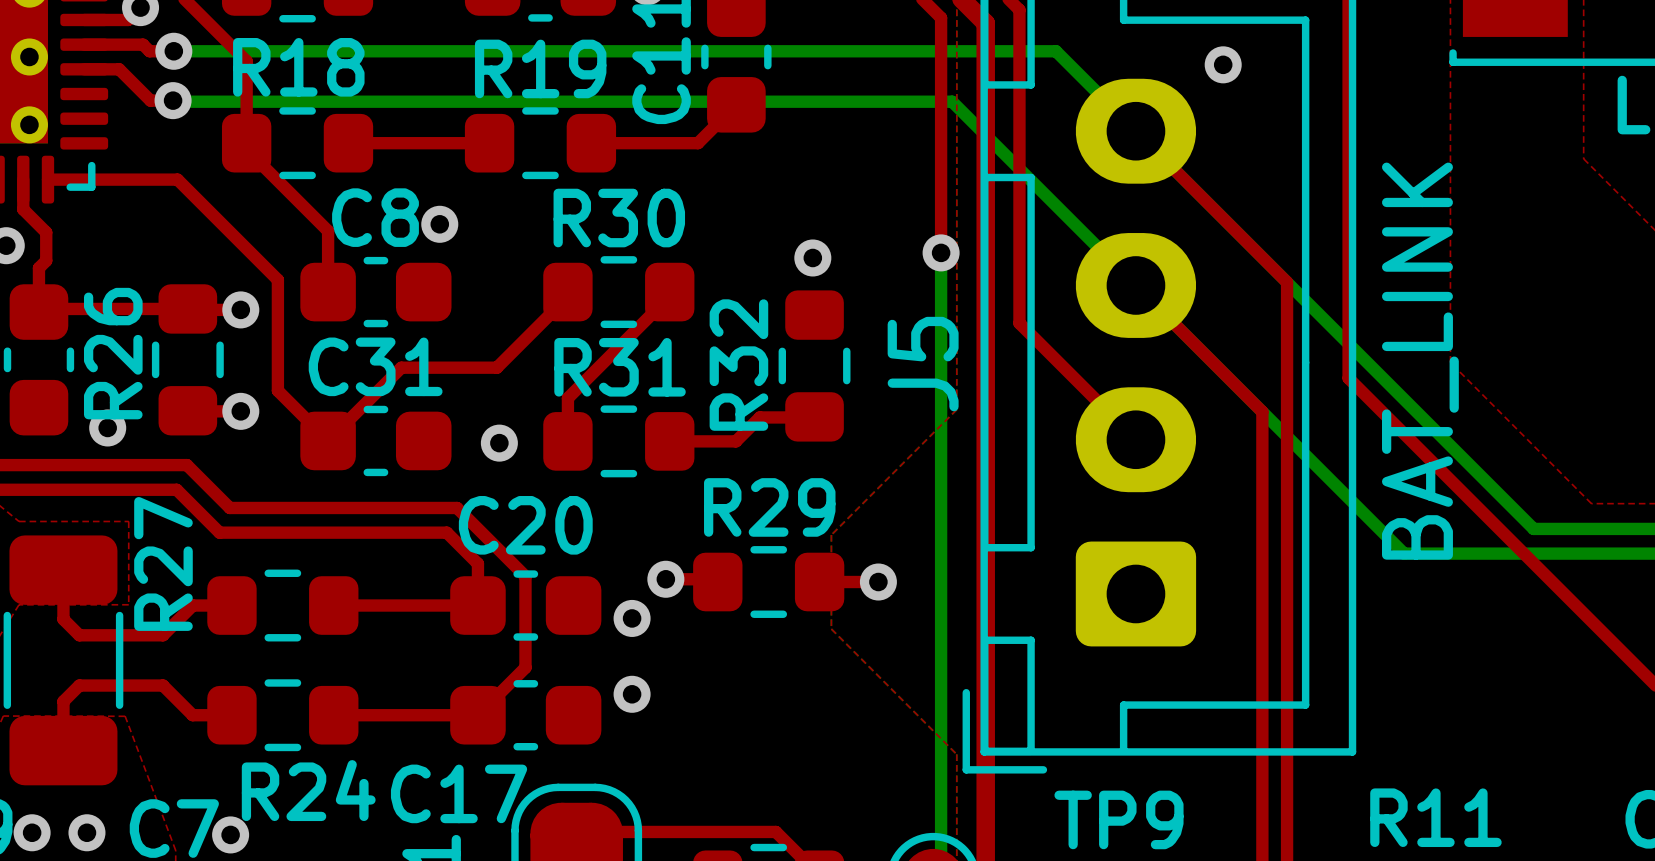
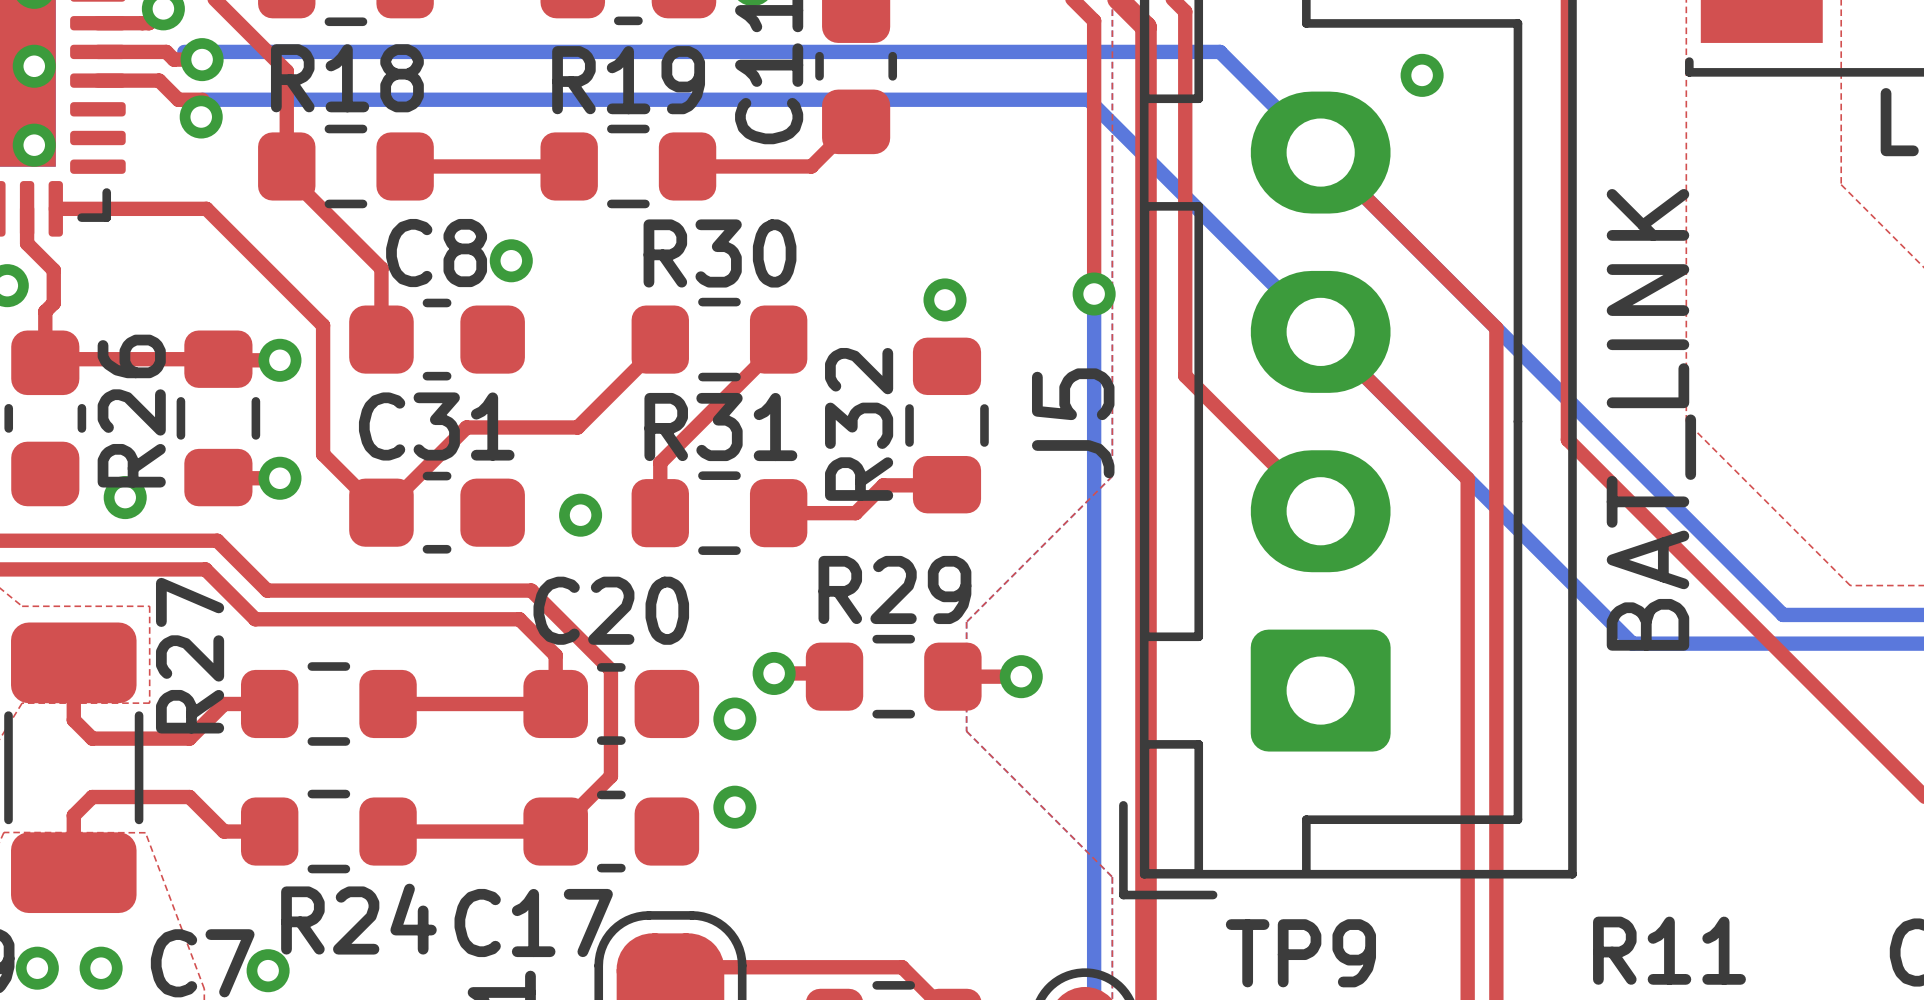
bottom track: (173, 51) (1056, 51) -> (184, 51) (1220, 51) (1227, 59)
top track: (119, 69) (150, 100) (173, 100) -> (138, 80) (159, 80) (178, 99) (202, 99)
bottom track: (173, 100) (952, 101) -> (202, 99) (1088, 99) (1107, 118)

